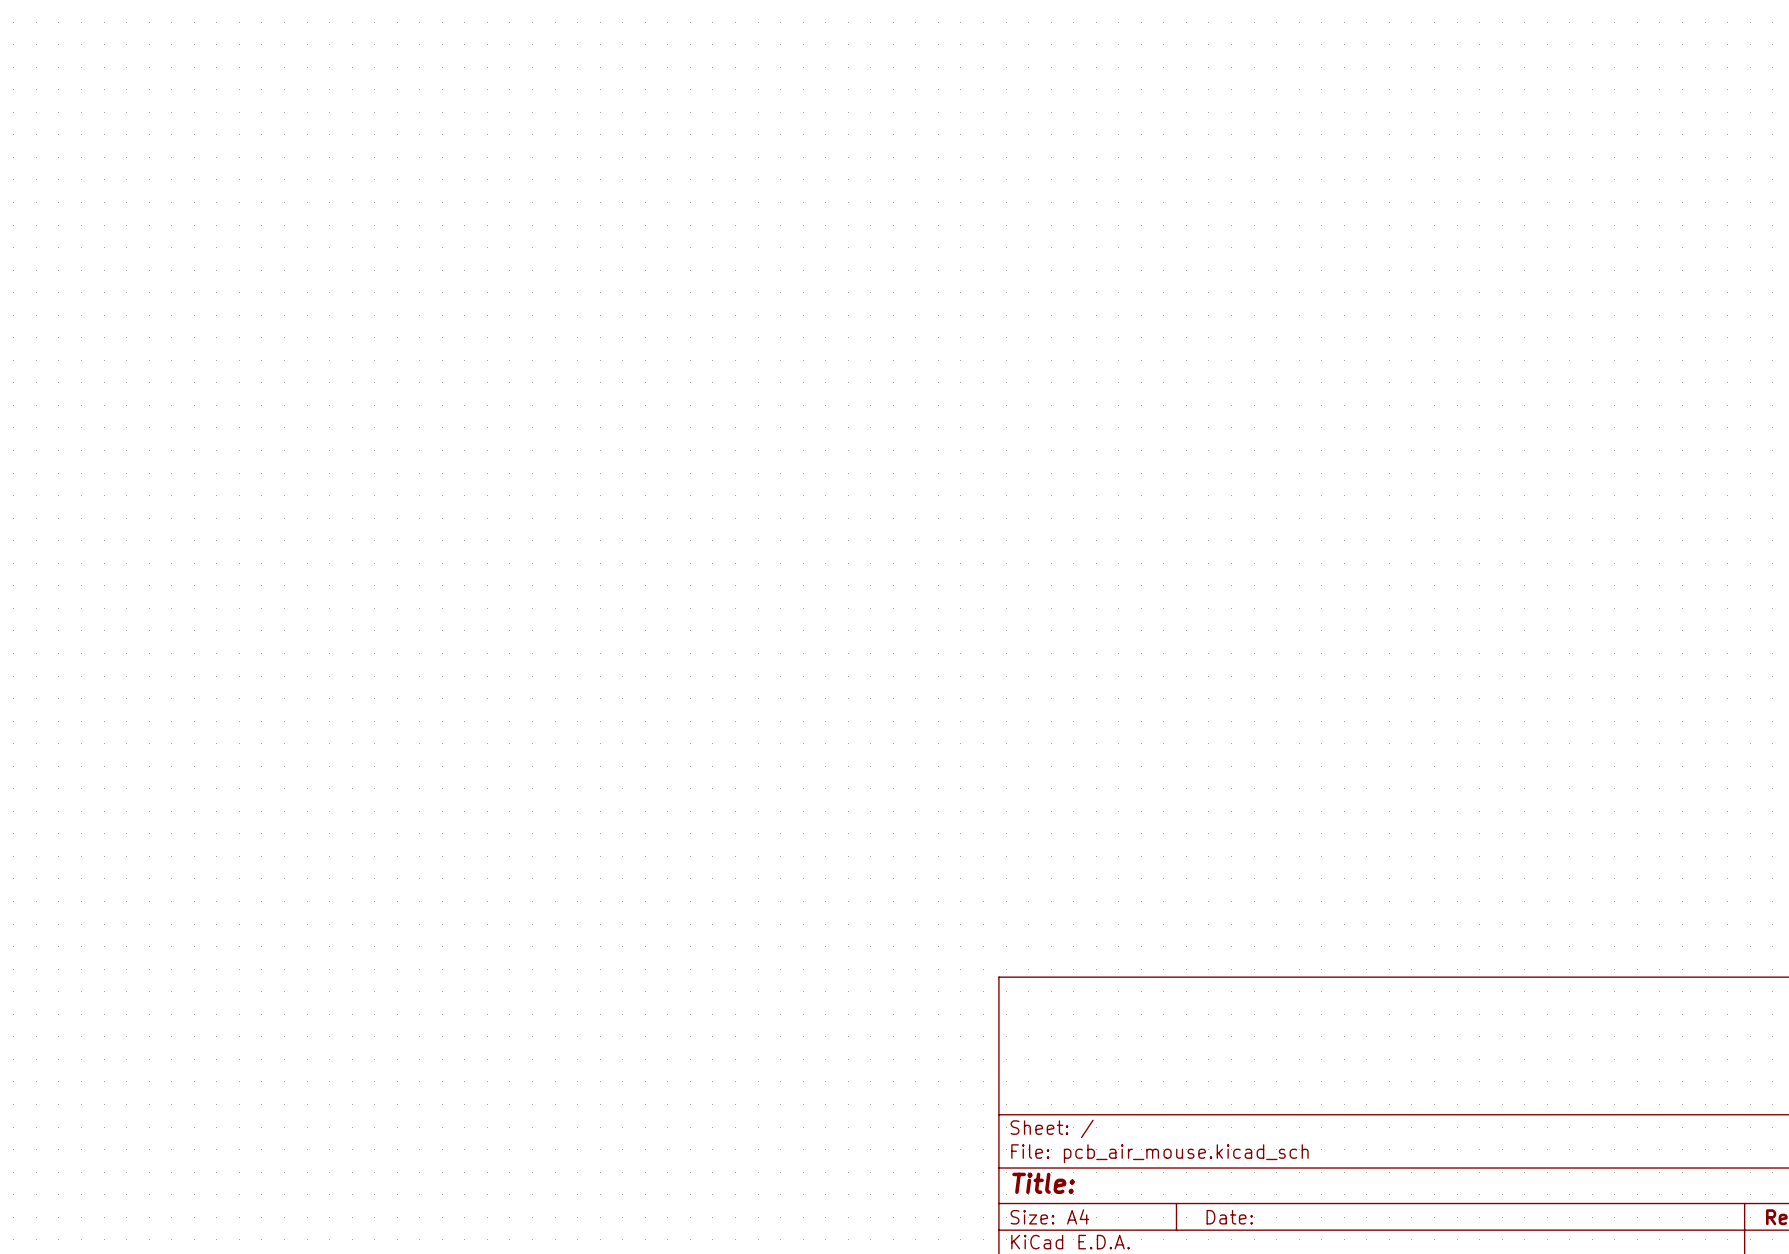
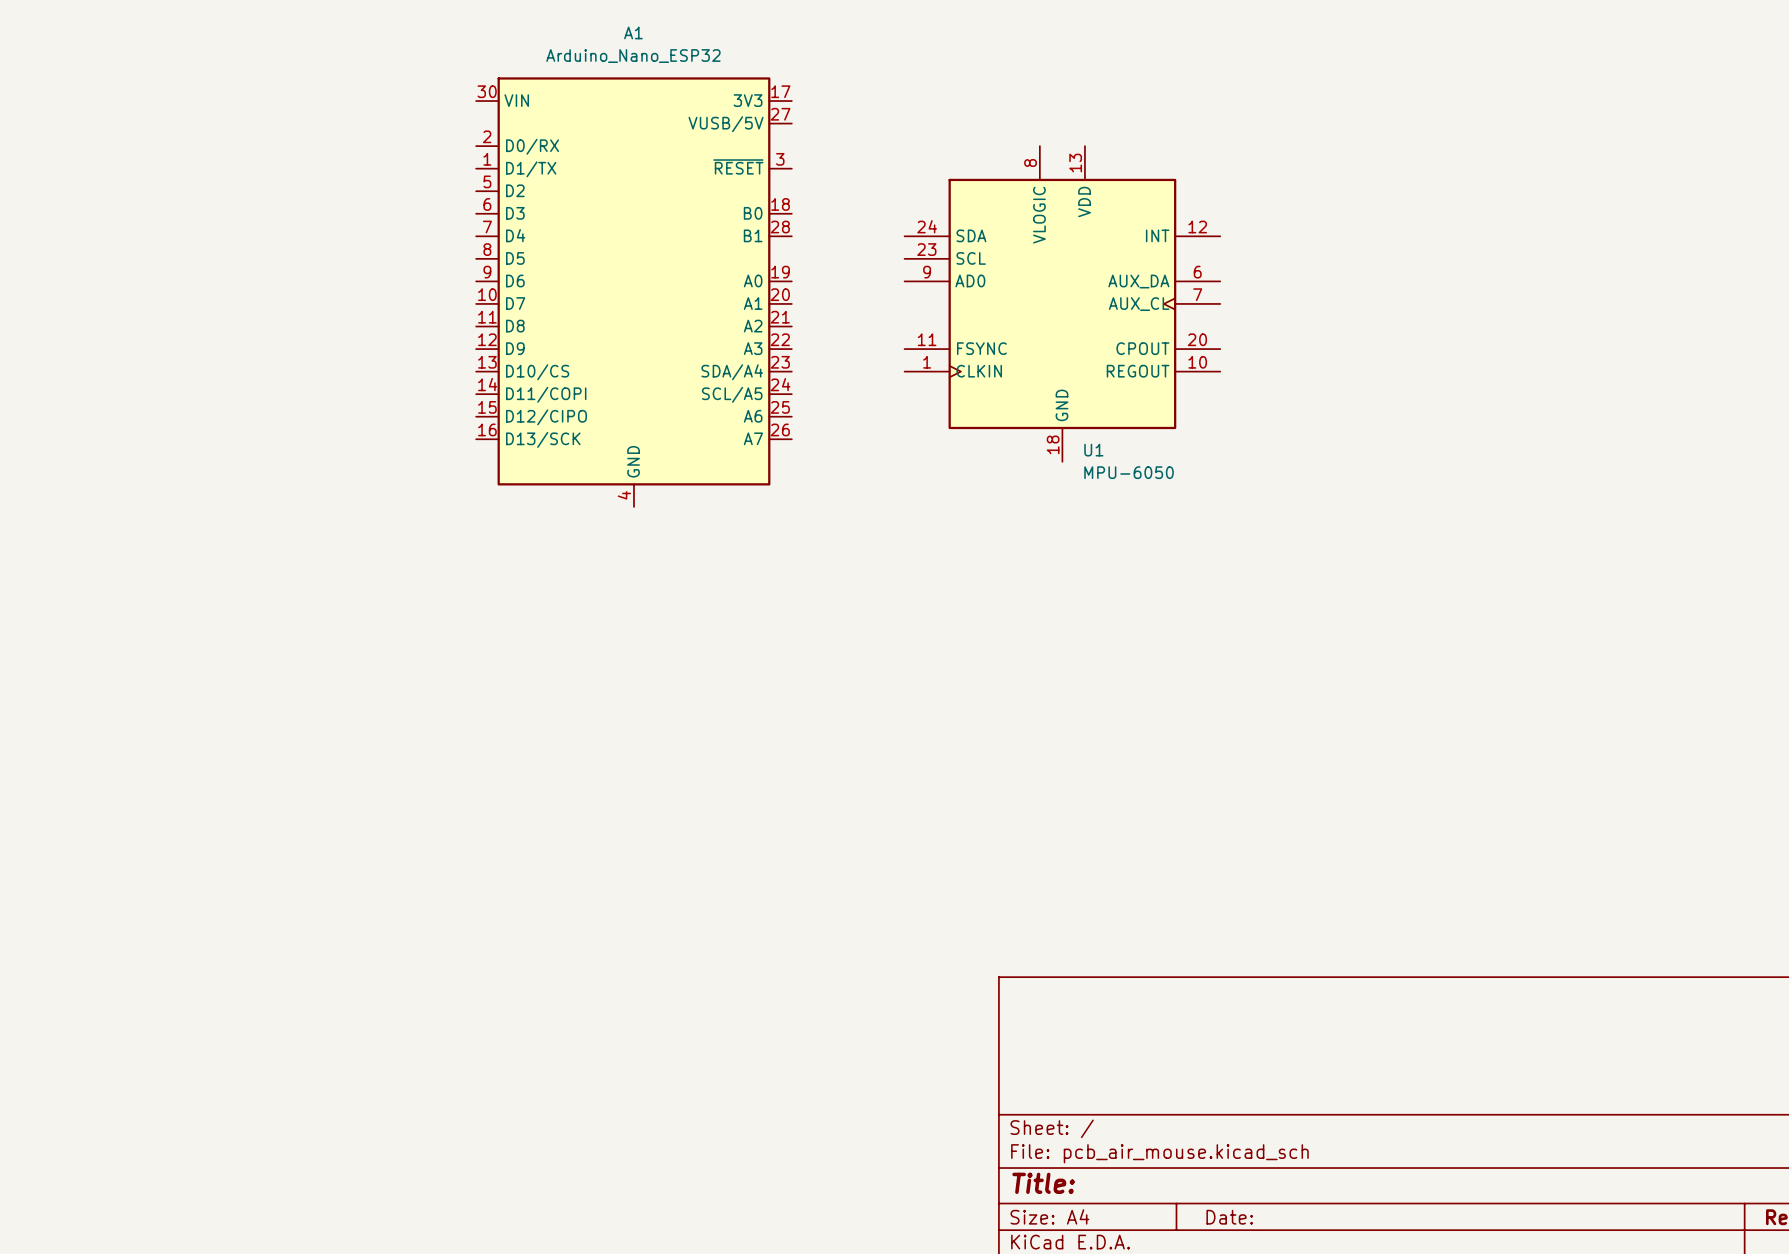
A1: none -> Arduino_Nano_ESP32 (633, 292)
U1: none -> MPU-6050 (1062, 303)

